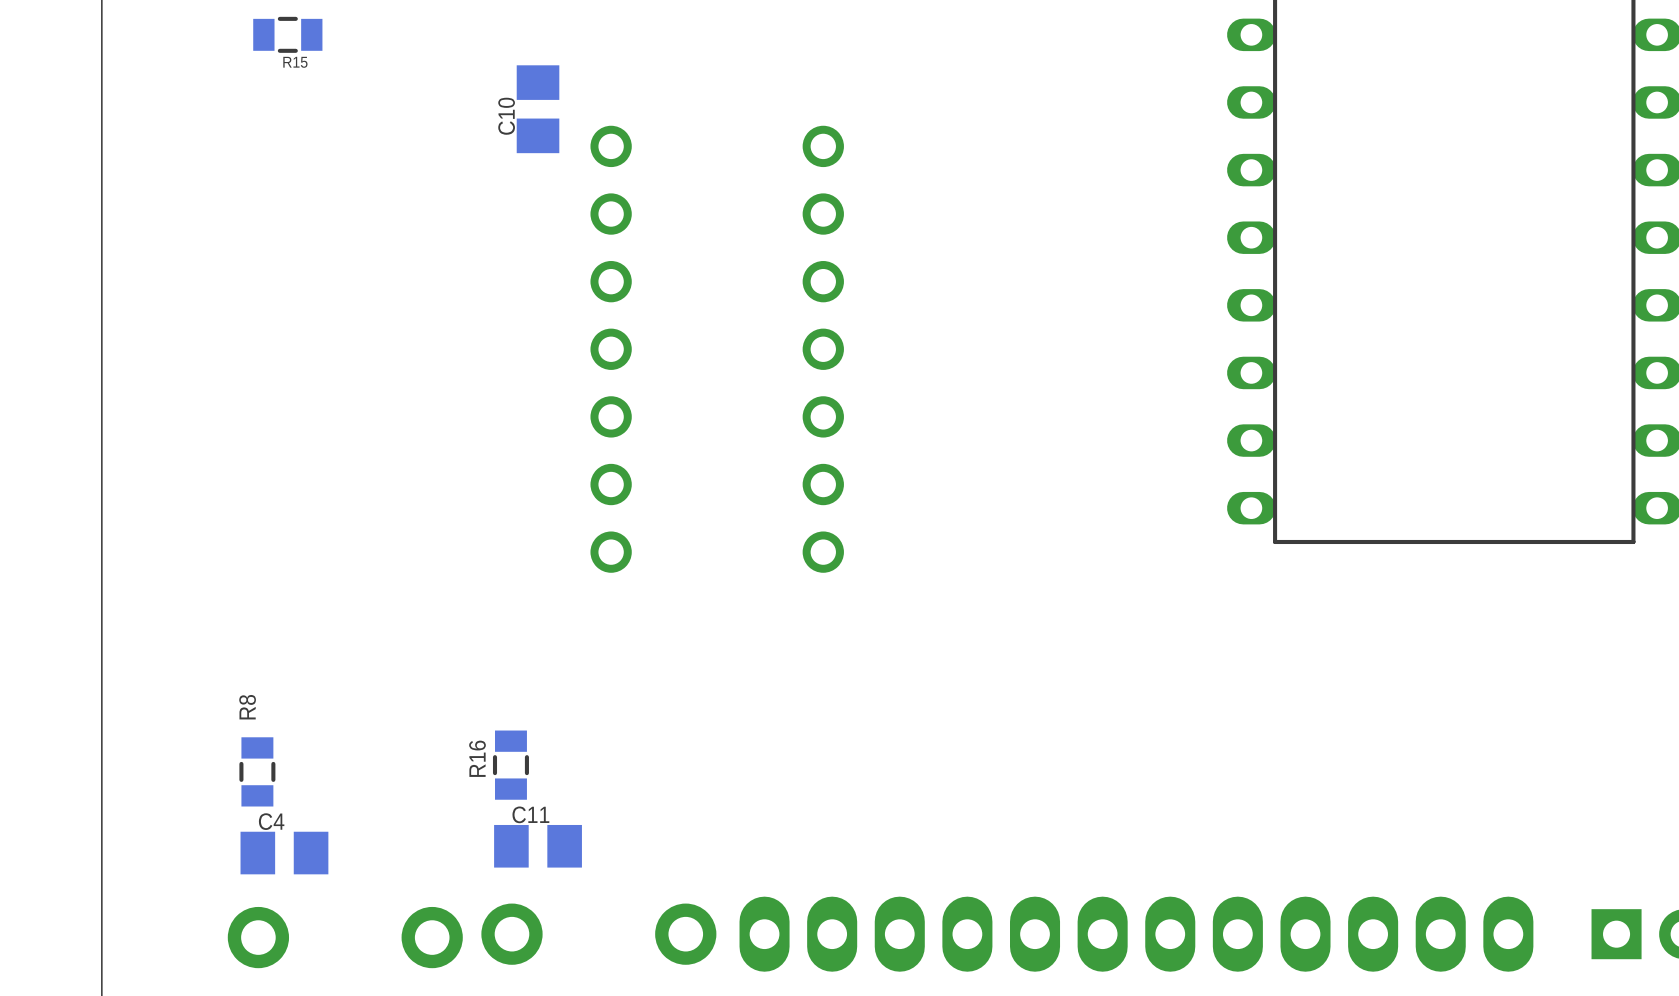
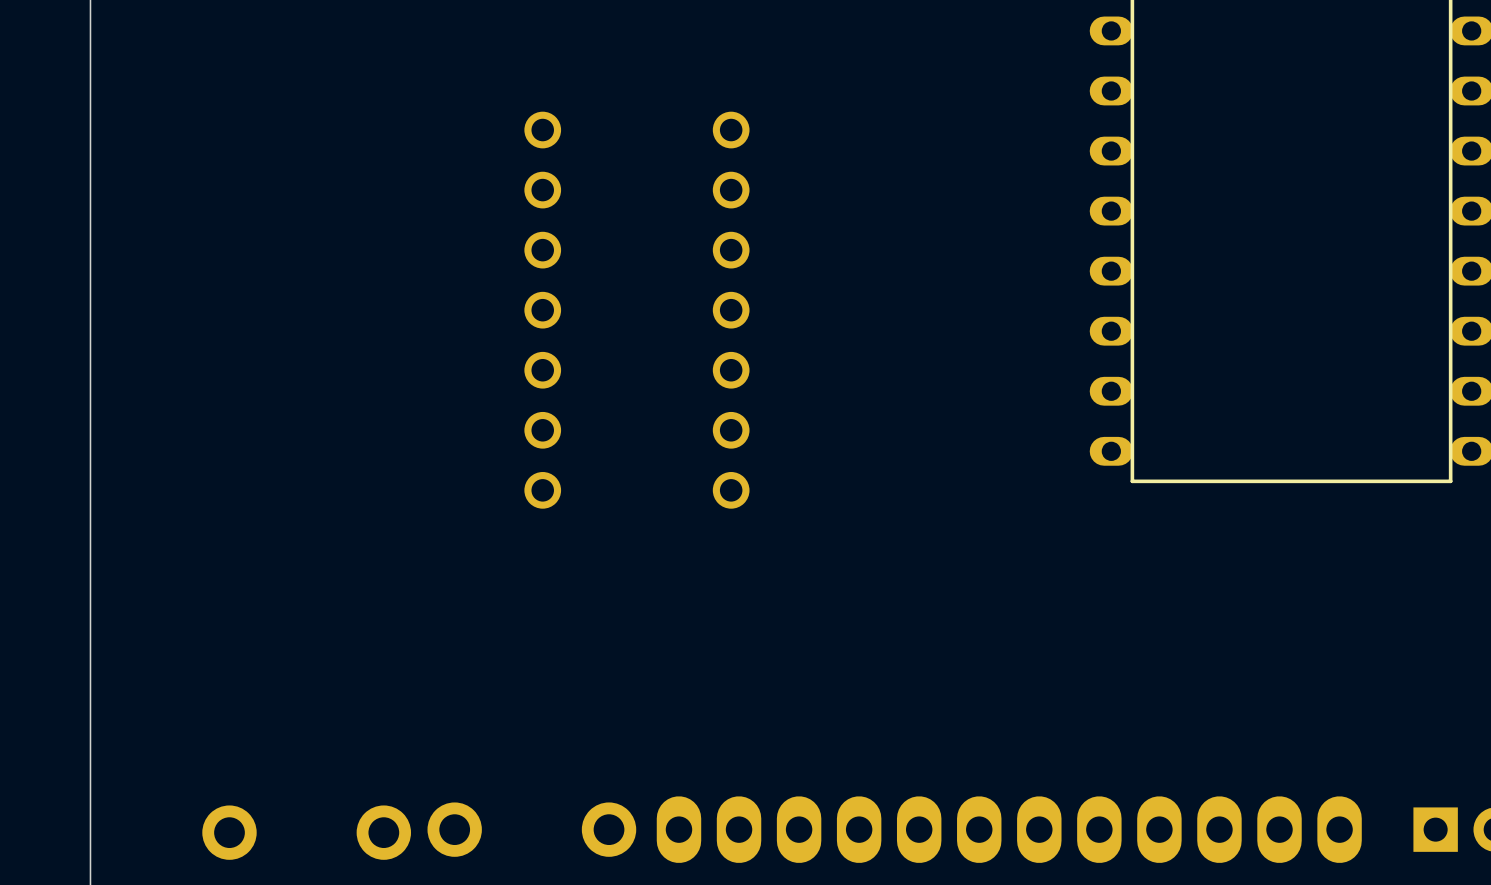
R15: (287, 34) -> none
C10: (538, 109) -> none
R16: (510, 765) -> none
R8: (257, 771) -> none
C11: (538, 846) -> none
C4: (284, 853) -> none

